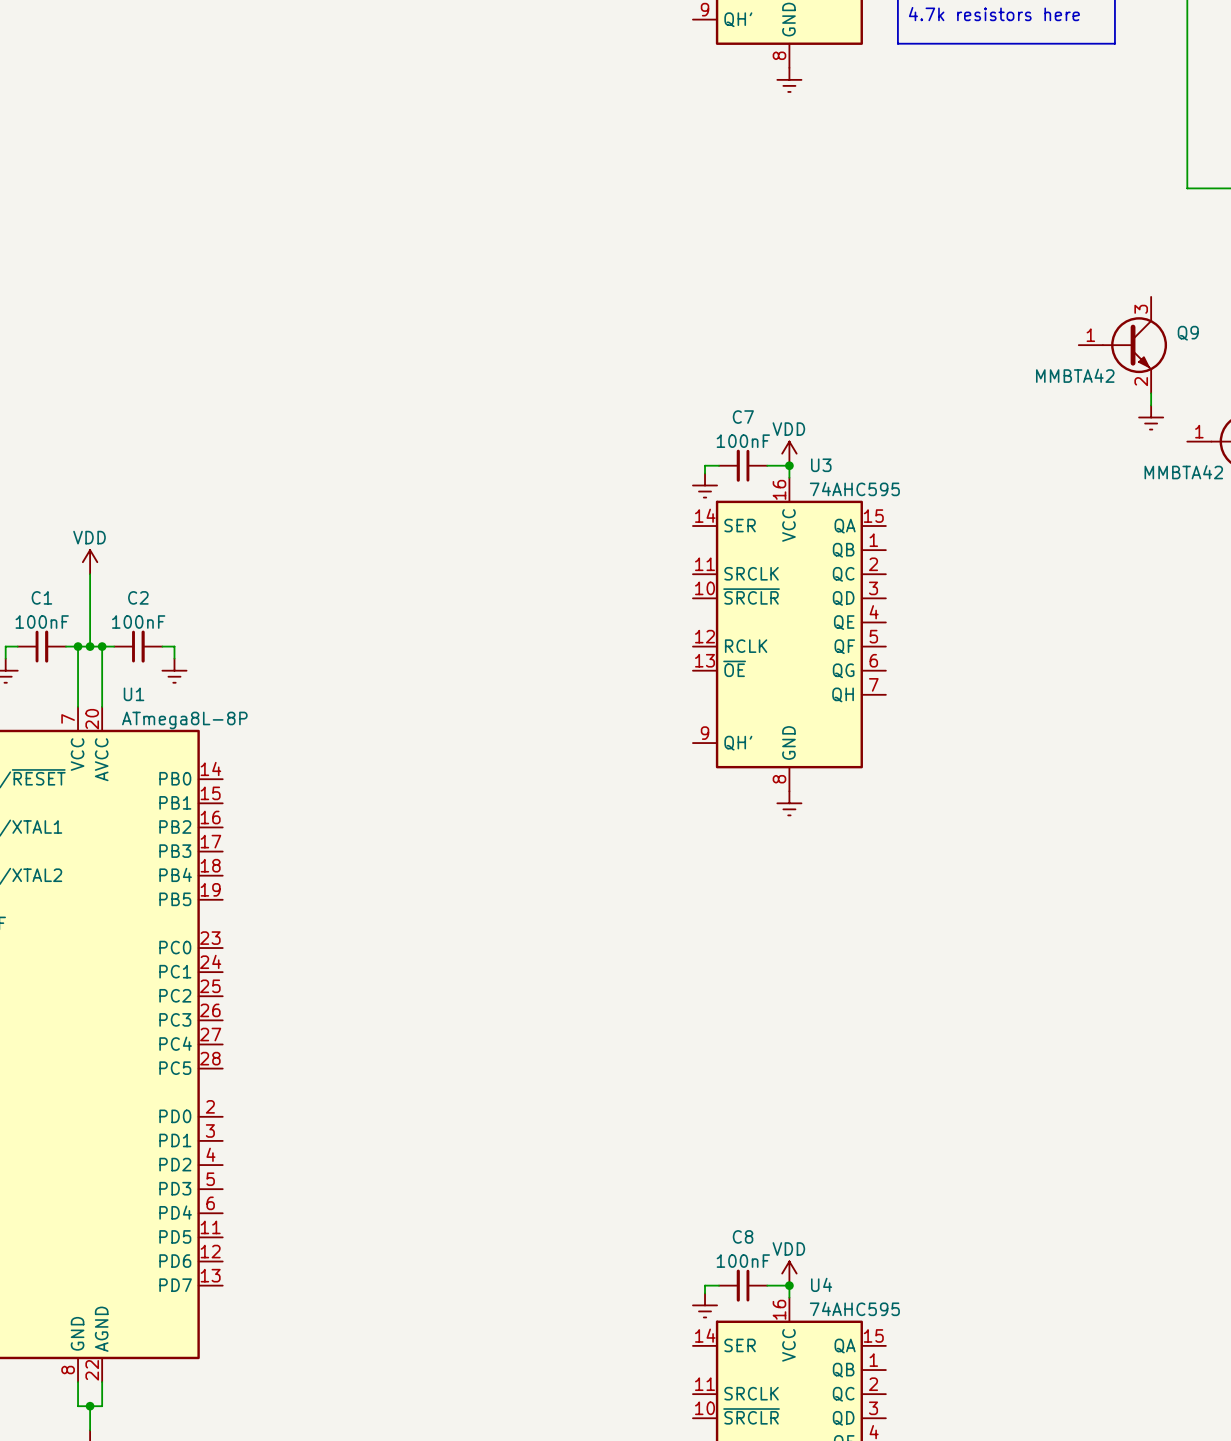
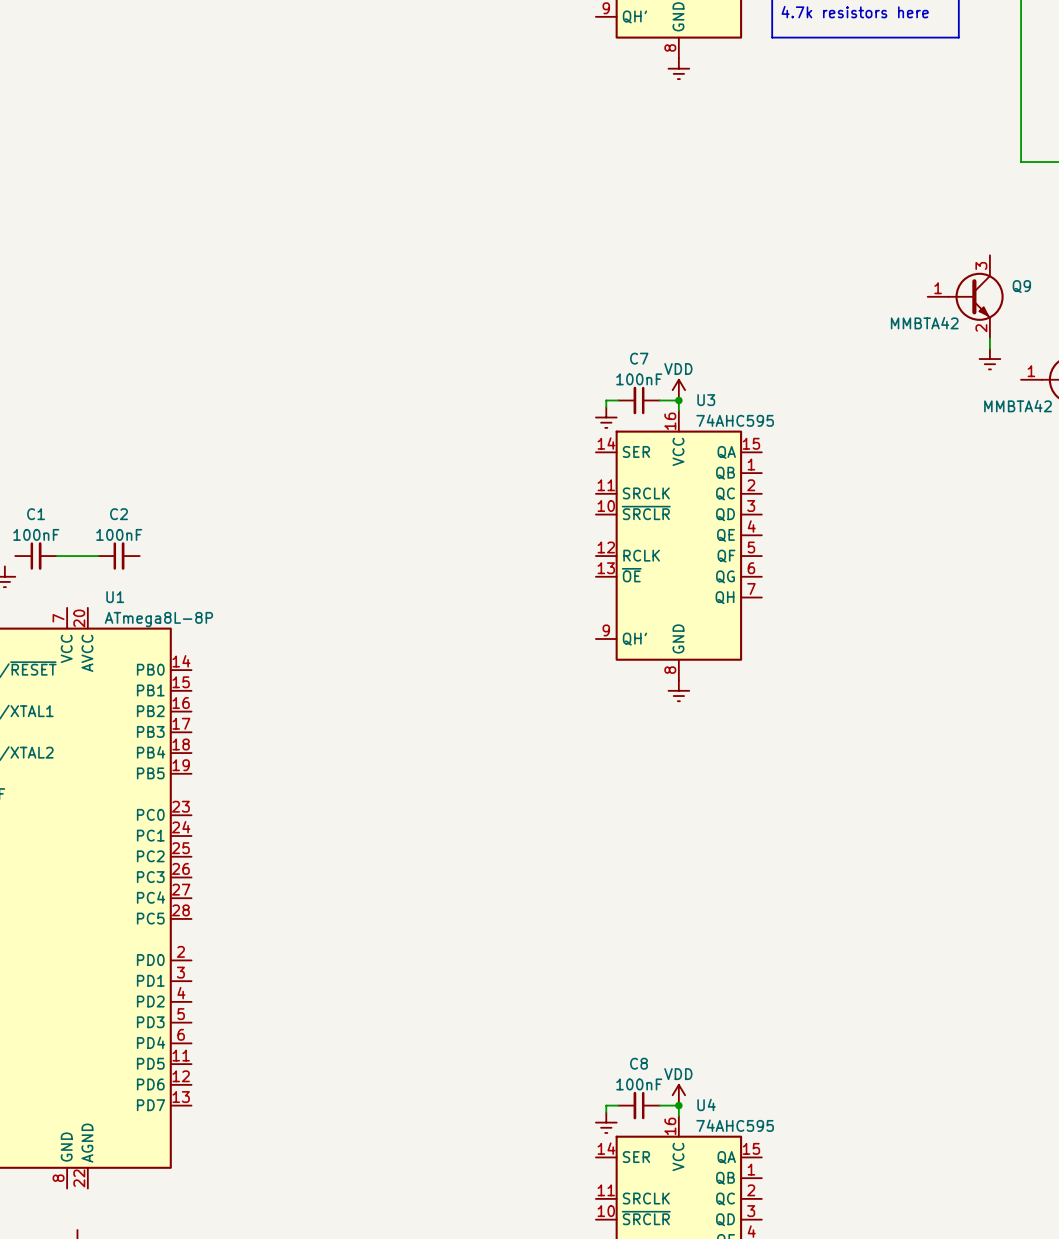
power symbol: VDD (90, 562) -> none
wire: (90, 574) (90, 646) -> none
wire: (17, 646) (5, 646) (5, 658) -> none
wire: (78, 646) (78, 706) -> none
junction: (78, 646) -> none
junction: (90, 646) -> none
wire: (102, 646) (102, 706) -> none
junction: (102, 646) -> none
wire: (162, 646) (174, 646) (174, 658) -> none
power symbol: (174, 670) -> none
wire: (78, 1382) (78, 1406) (102, 1406) (102, 1382) -> none
wire: (90, 1406) (90, 1430) -> none
junction: (90, 1406) -> none

